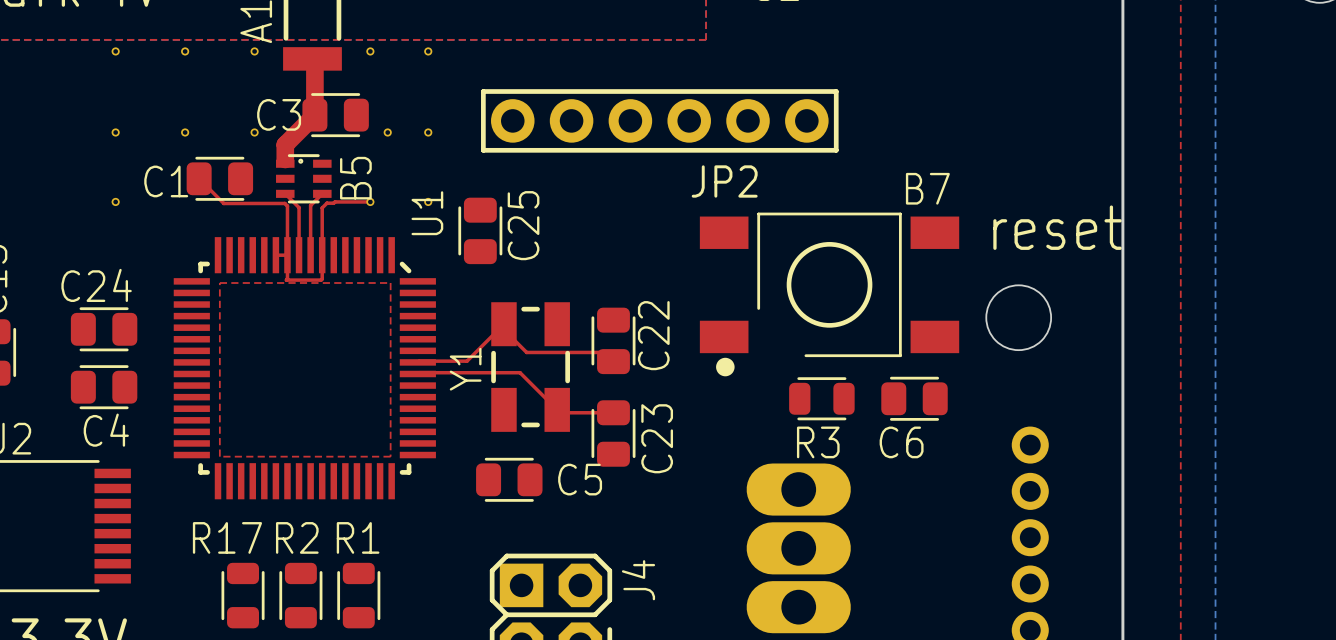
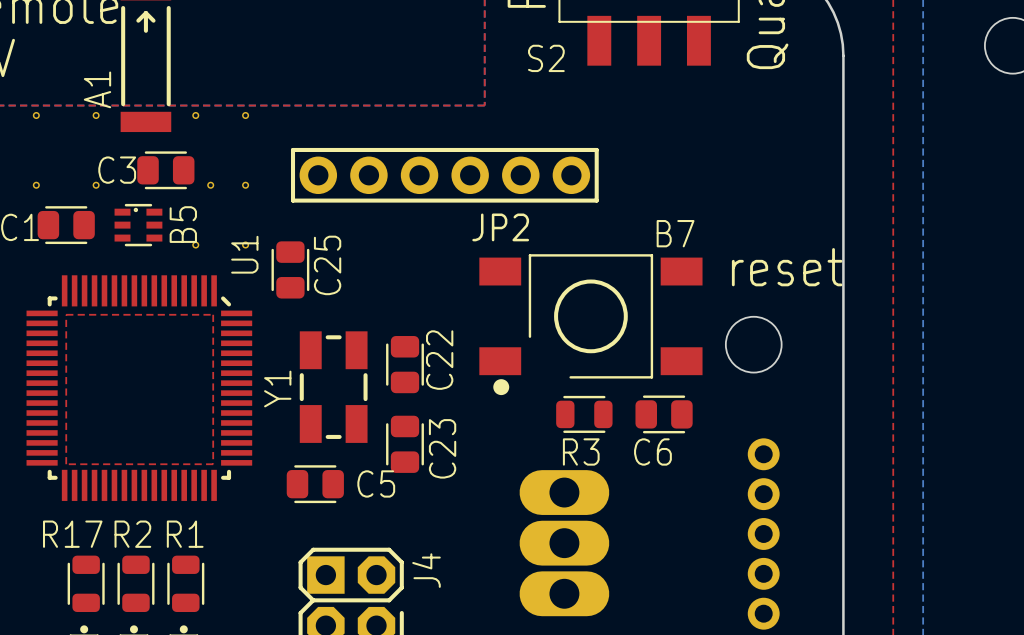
top track: (312, 58) (314, 61) (314, 115) (285, 144) (285, 163) -> none
top track: (199, 178) (223, 203) (284, 203) (287, 206) (286, 280) (322, 279) (322, 207) (326, 203) (370, 201) -> none
top track: (285, 193) (299, 207) (299, 255) -> none
top track: (322, 193) (310, 205) (310, 255) -> none
top track: (275, 255) (287, 256) -> none
top track: (613, 361) (604, 352) (526, 352) (503, 329) (503, 324) (467, 361) (417, 362) -> none
top track: (417, 373) (520, 372) (560, 412) (613, 412) -> none

